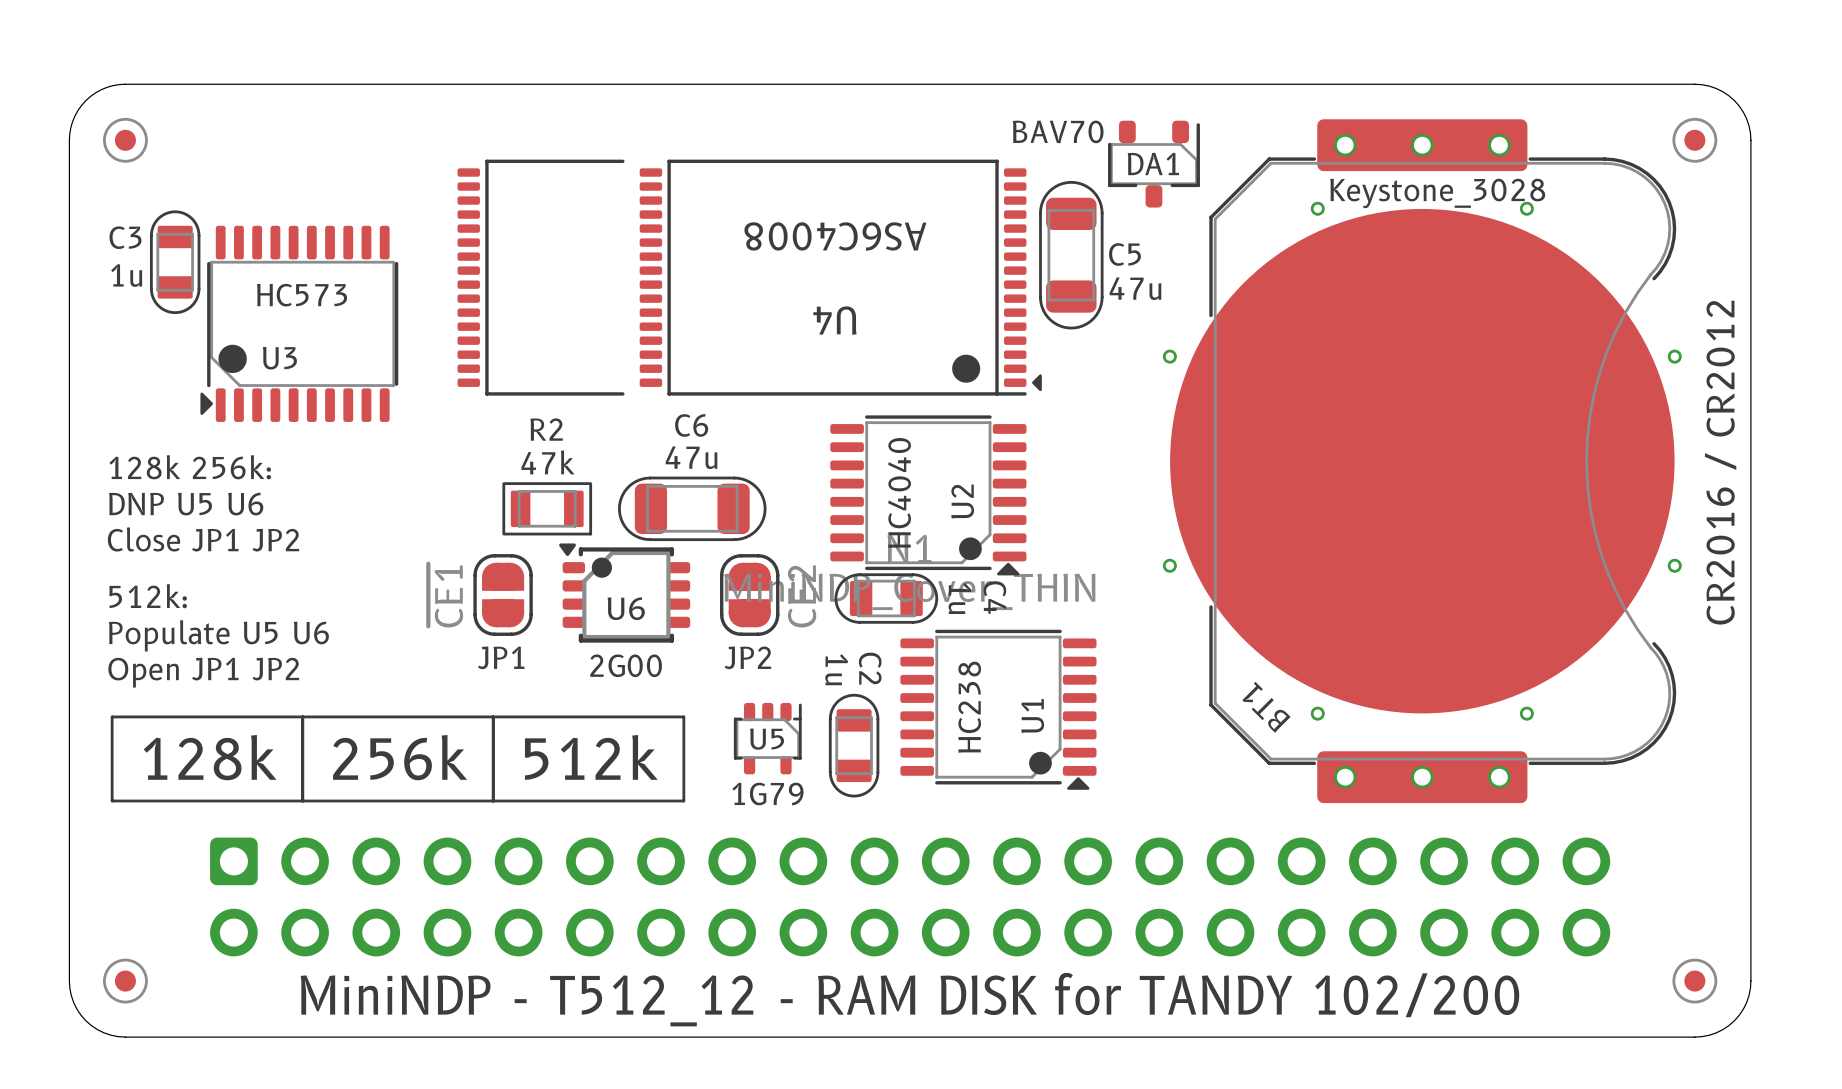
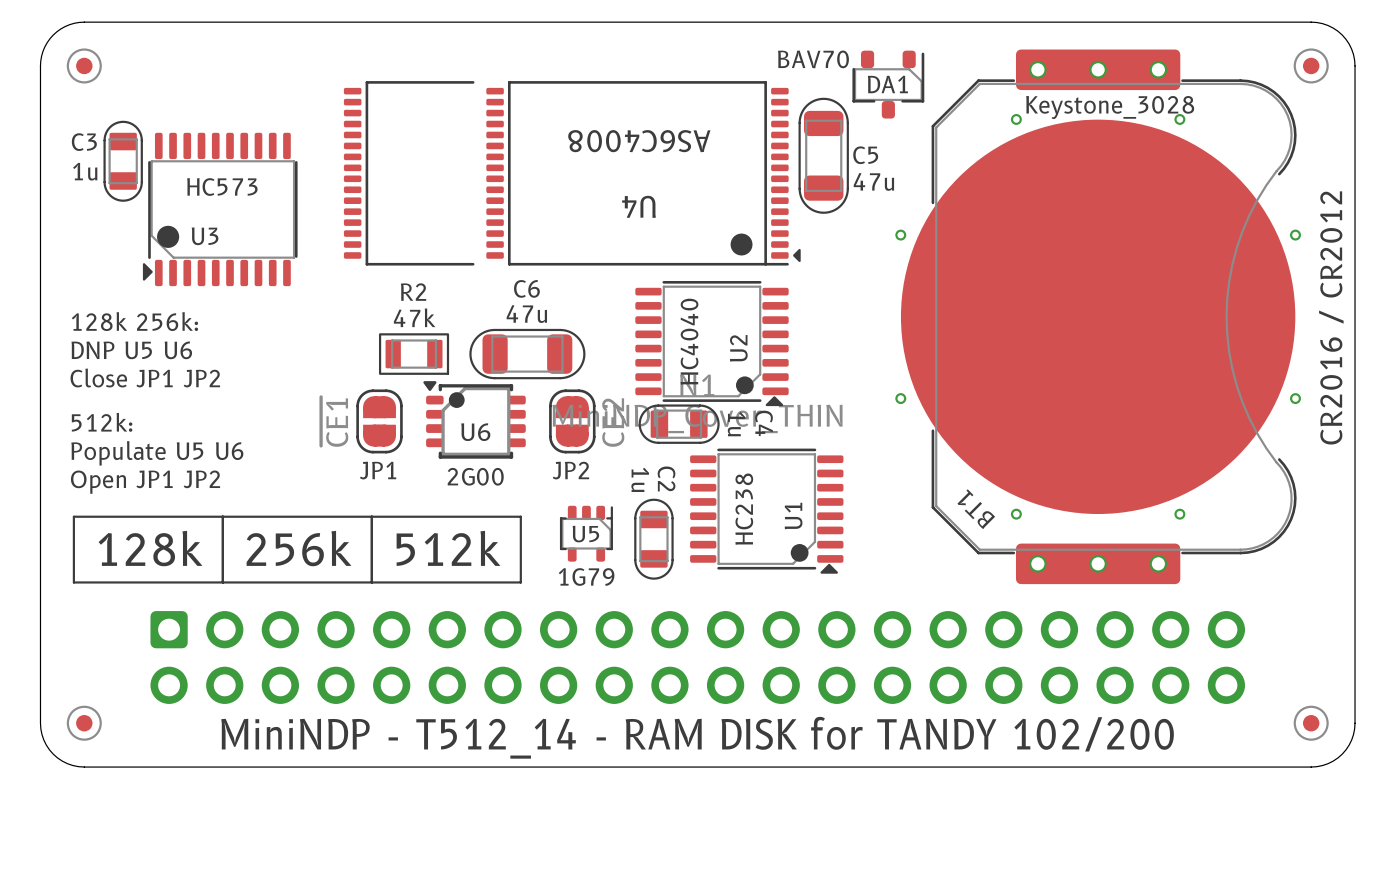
text: MiniNDP - T512_12 - RAM DISK for TANDY 102/200 (909, 999) -> MiniNDP - T512_14 - RAM DISK for TANDY 102/200 (697, 737)

